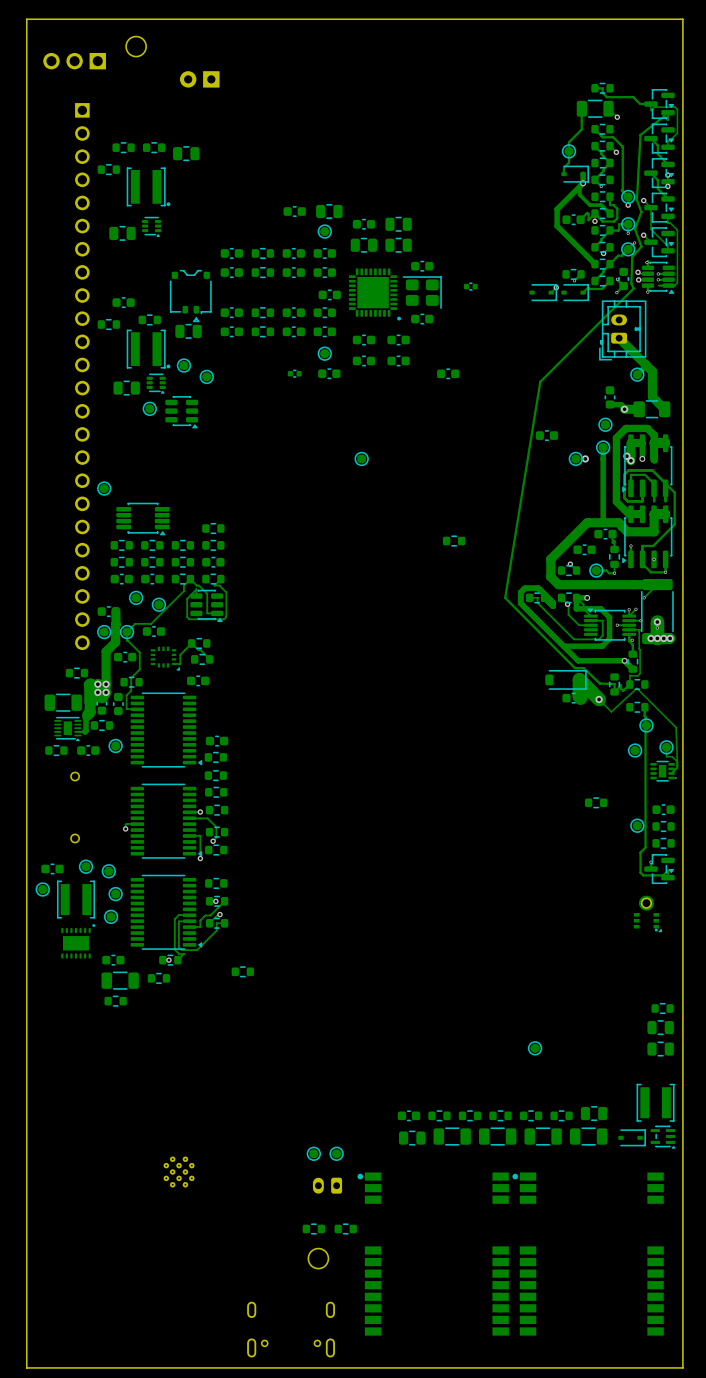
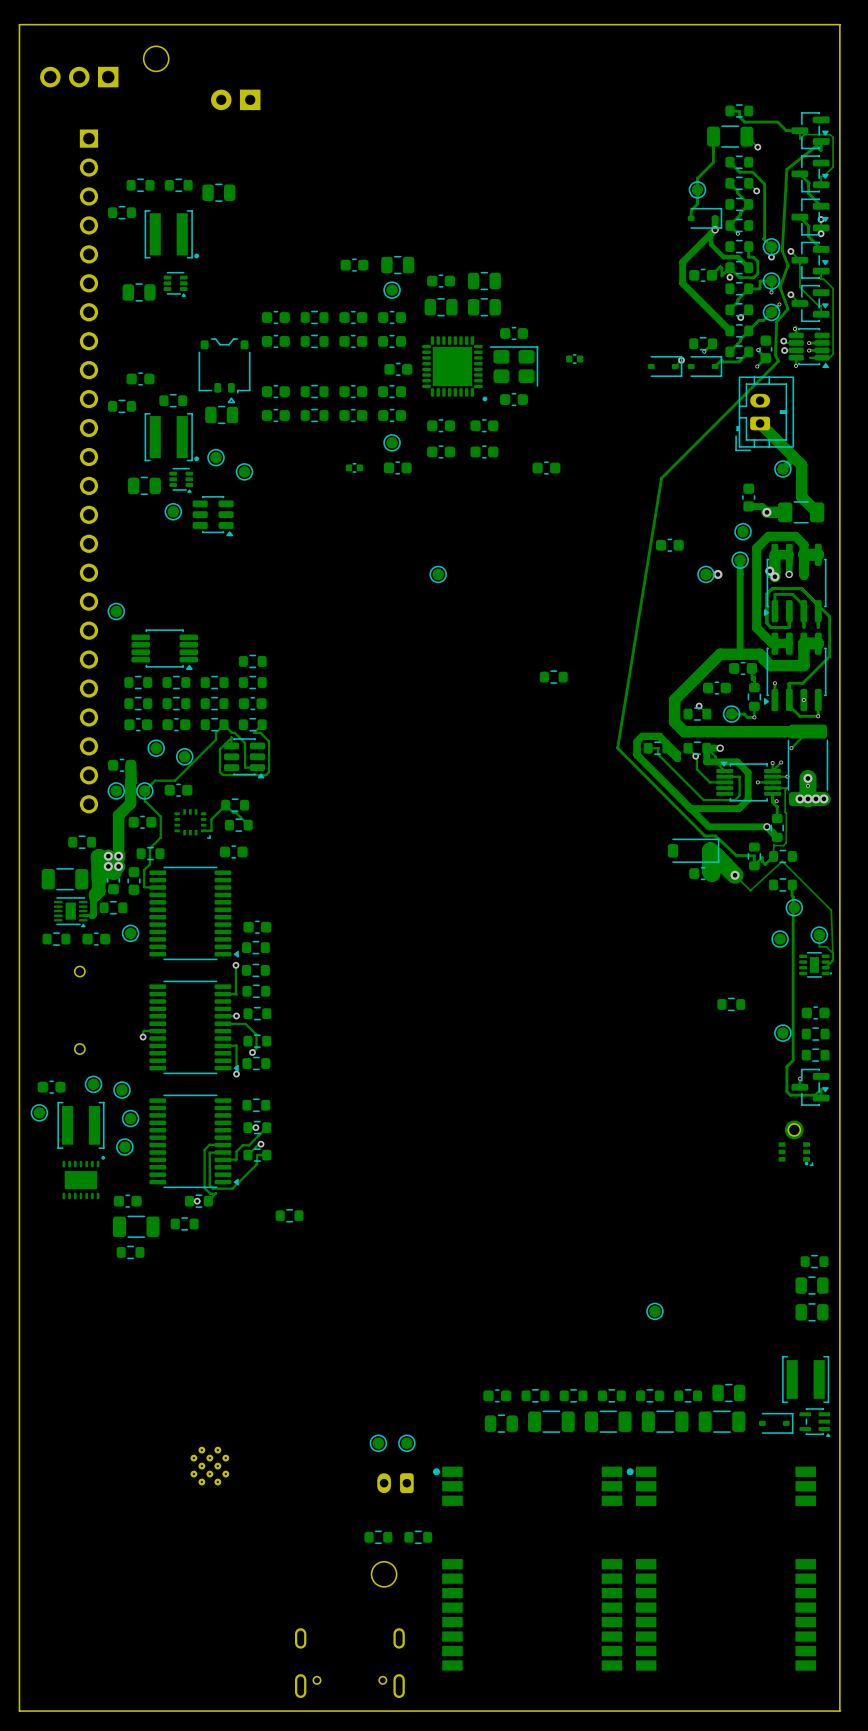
track: none -> (235, 965) (236, 994) (223, 994)
via: none -> (235, 965)

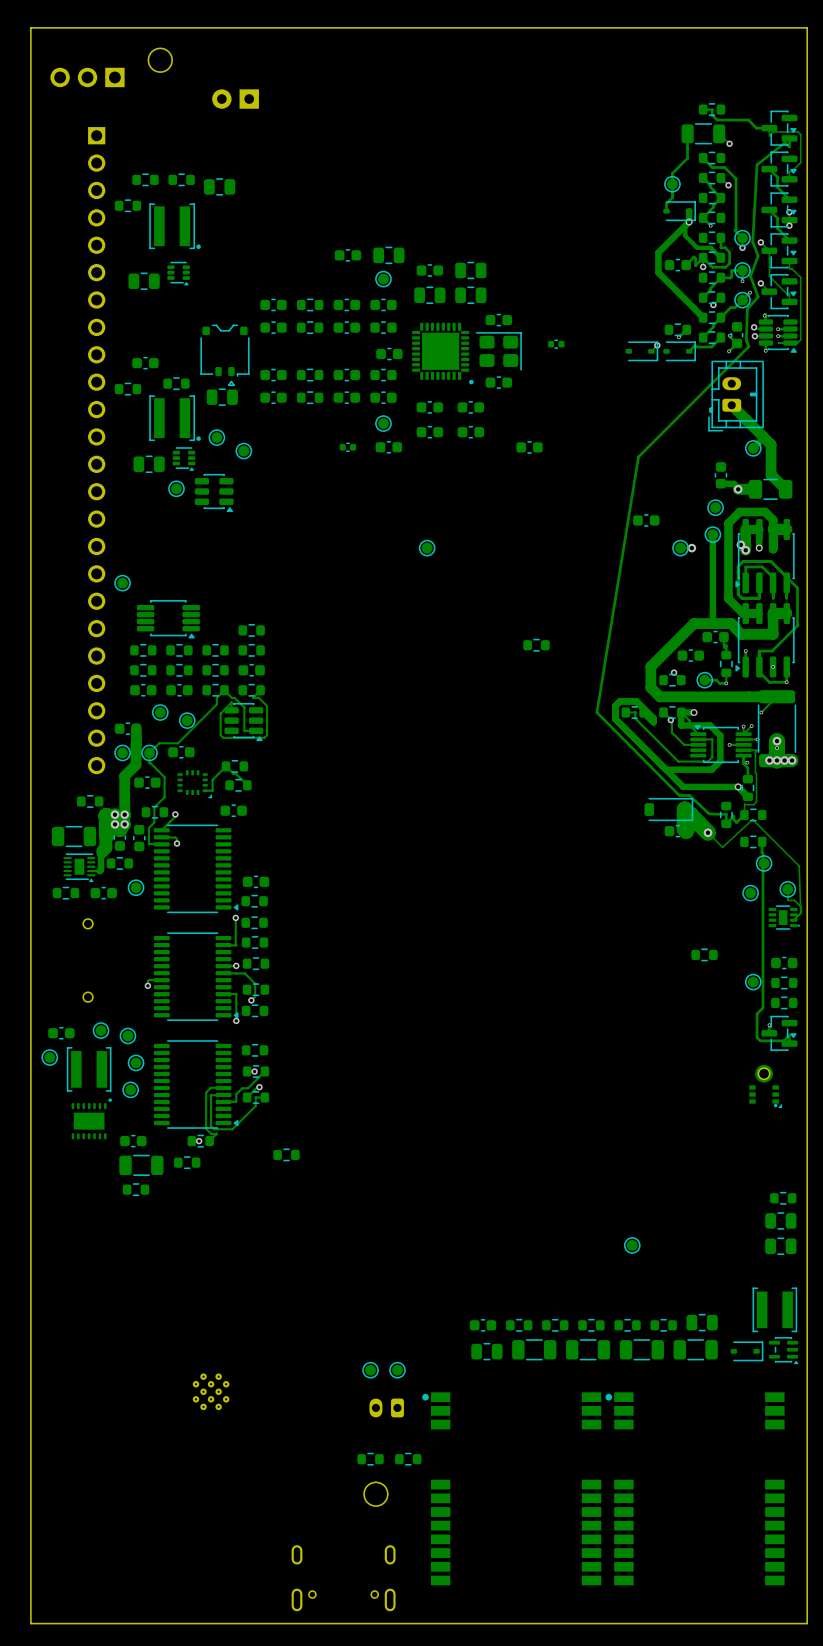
track: none -> (175, 814) (161, 830)
via: none -> (175, 814)
track: none -> (161, 837) (175, 837) (177, 843)
via: none -> (177, 843)

